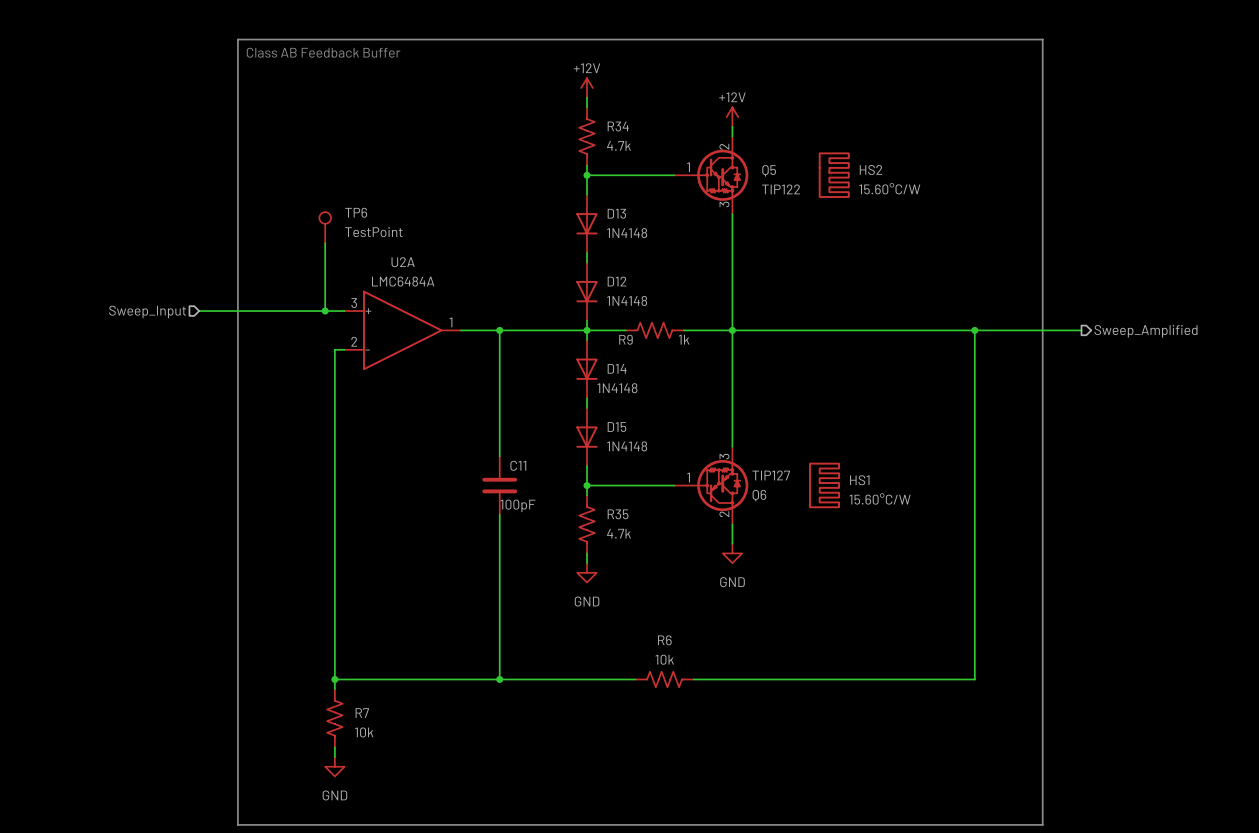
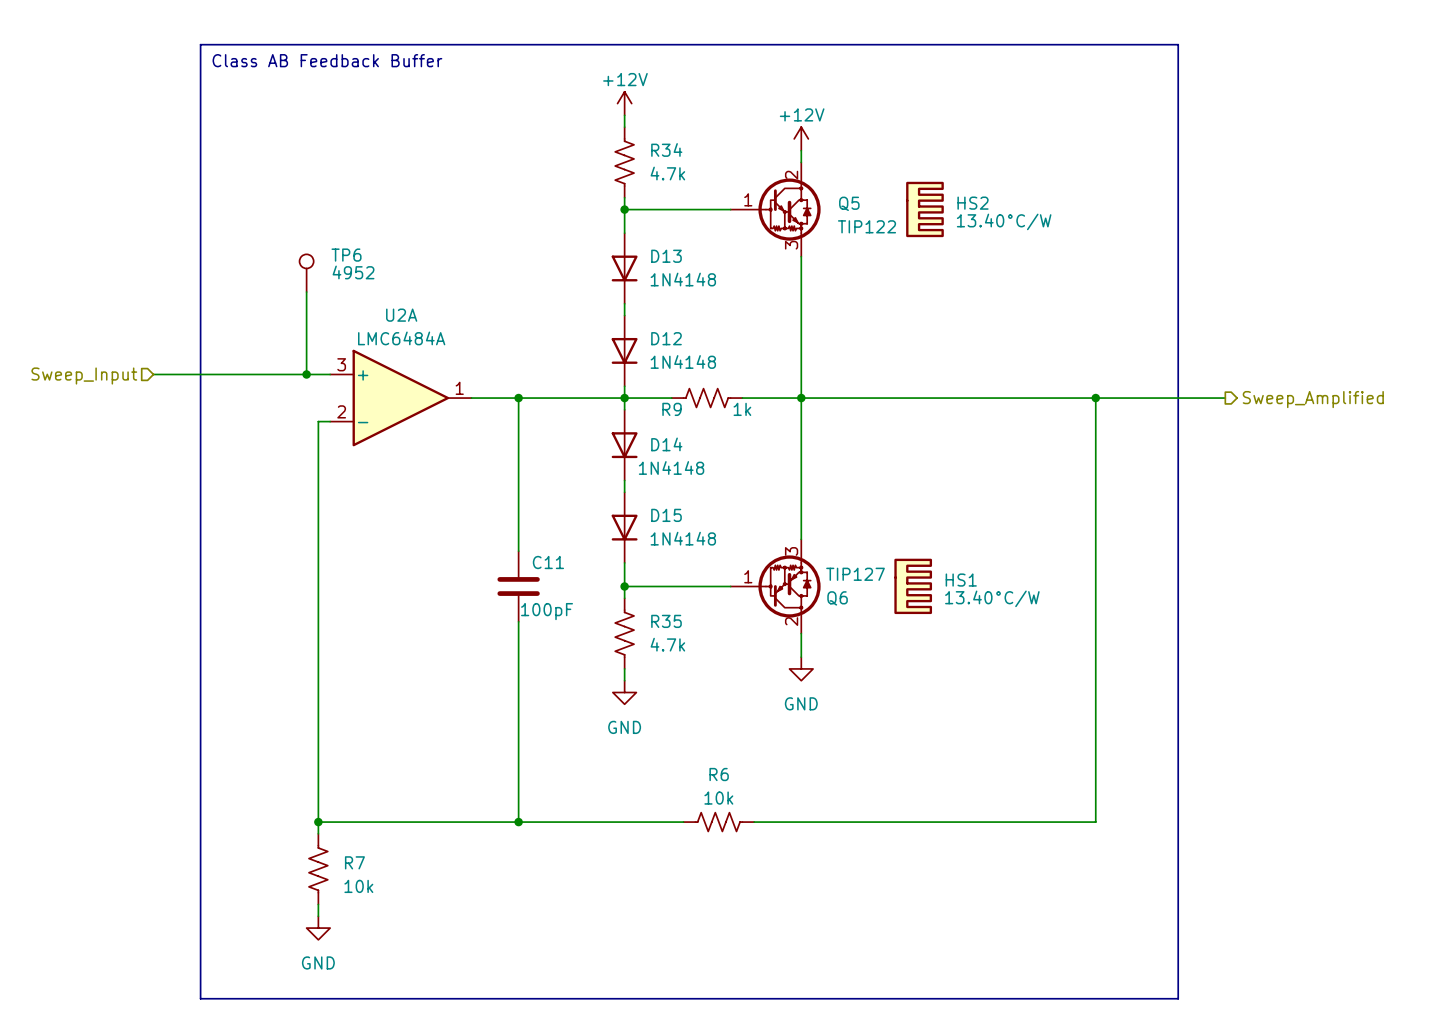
HS2 value: 15.60°C/W (889, 188) -> 13.40°C/W (1004, 221)
TP6 value: TestPoint (373, 232) -> 4952 (353, 272)
HS1 value: 15.60°C/W (880, 498) -> 13.40°C/W (992, 598)

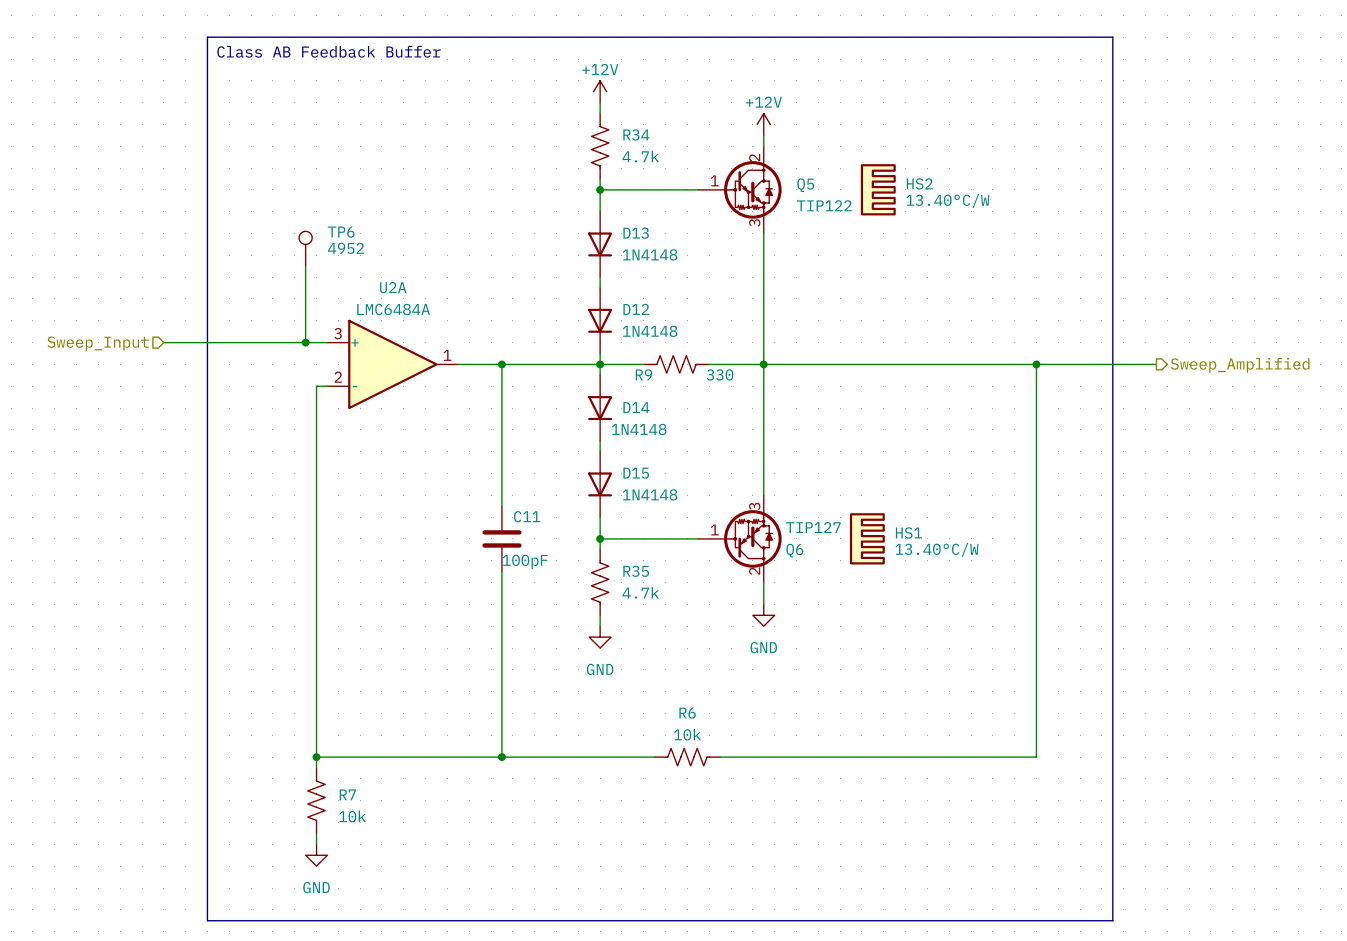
R9 value: 1k (742, 409) -> 330 (720, 374)

